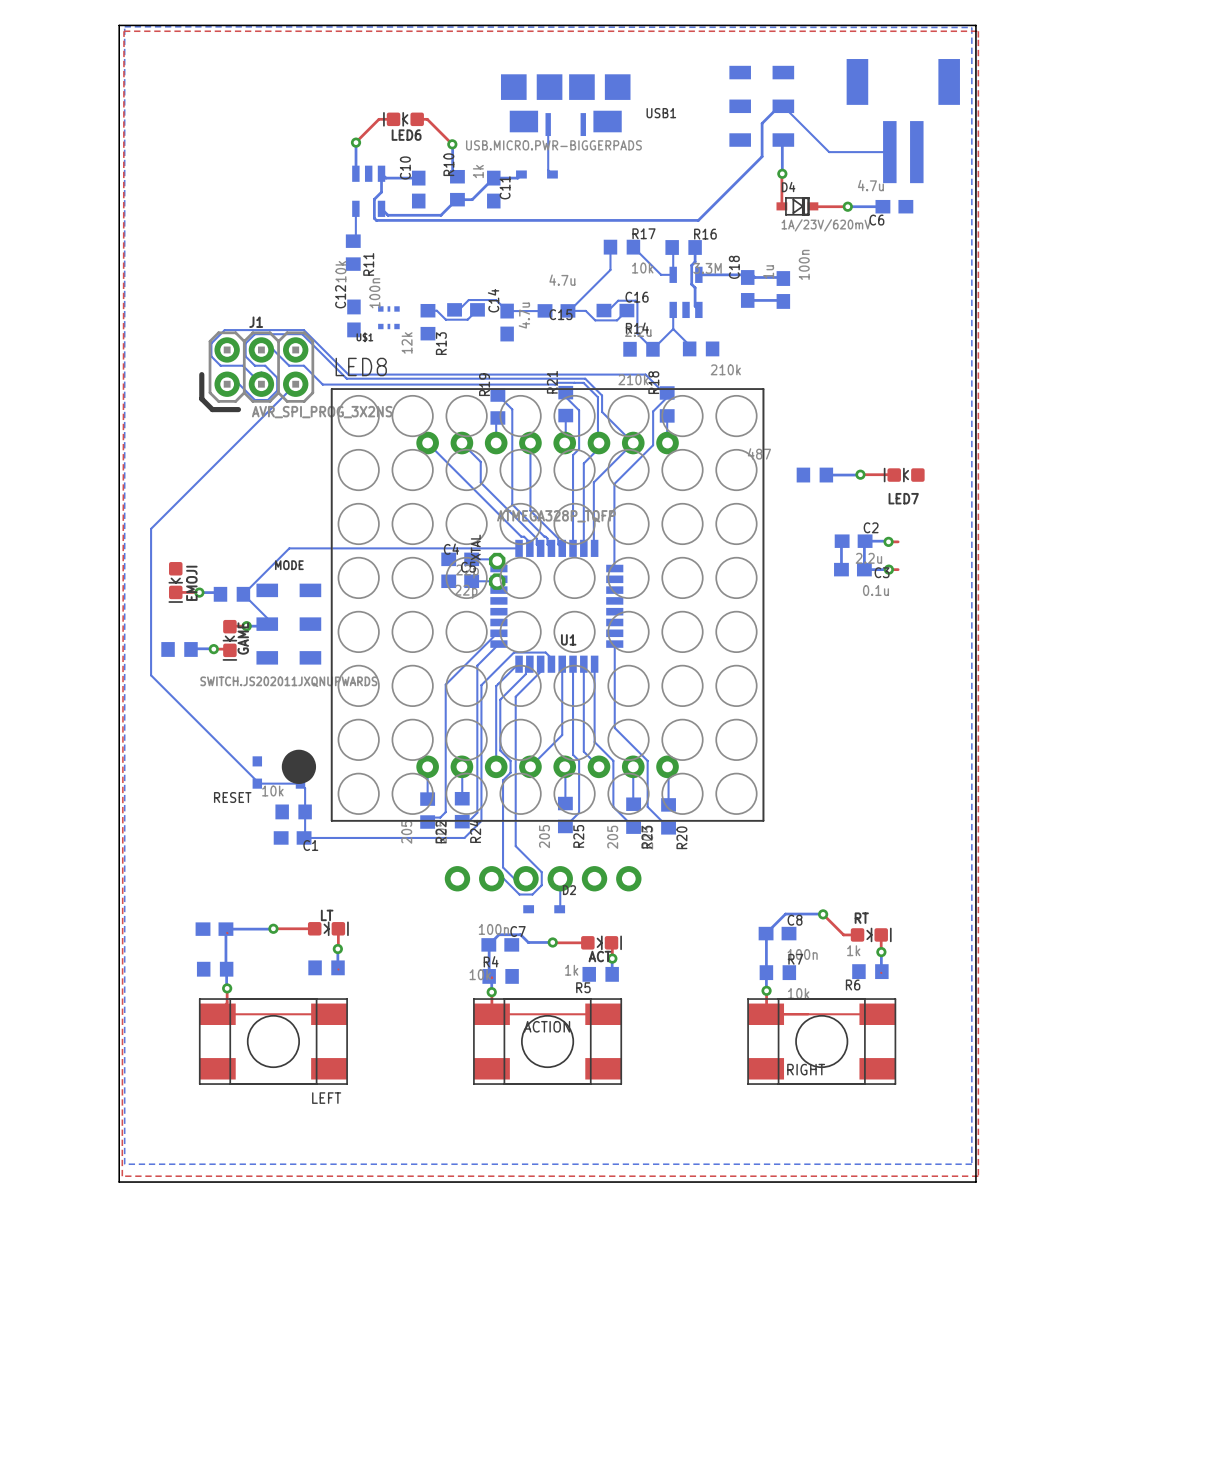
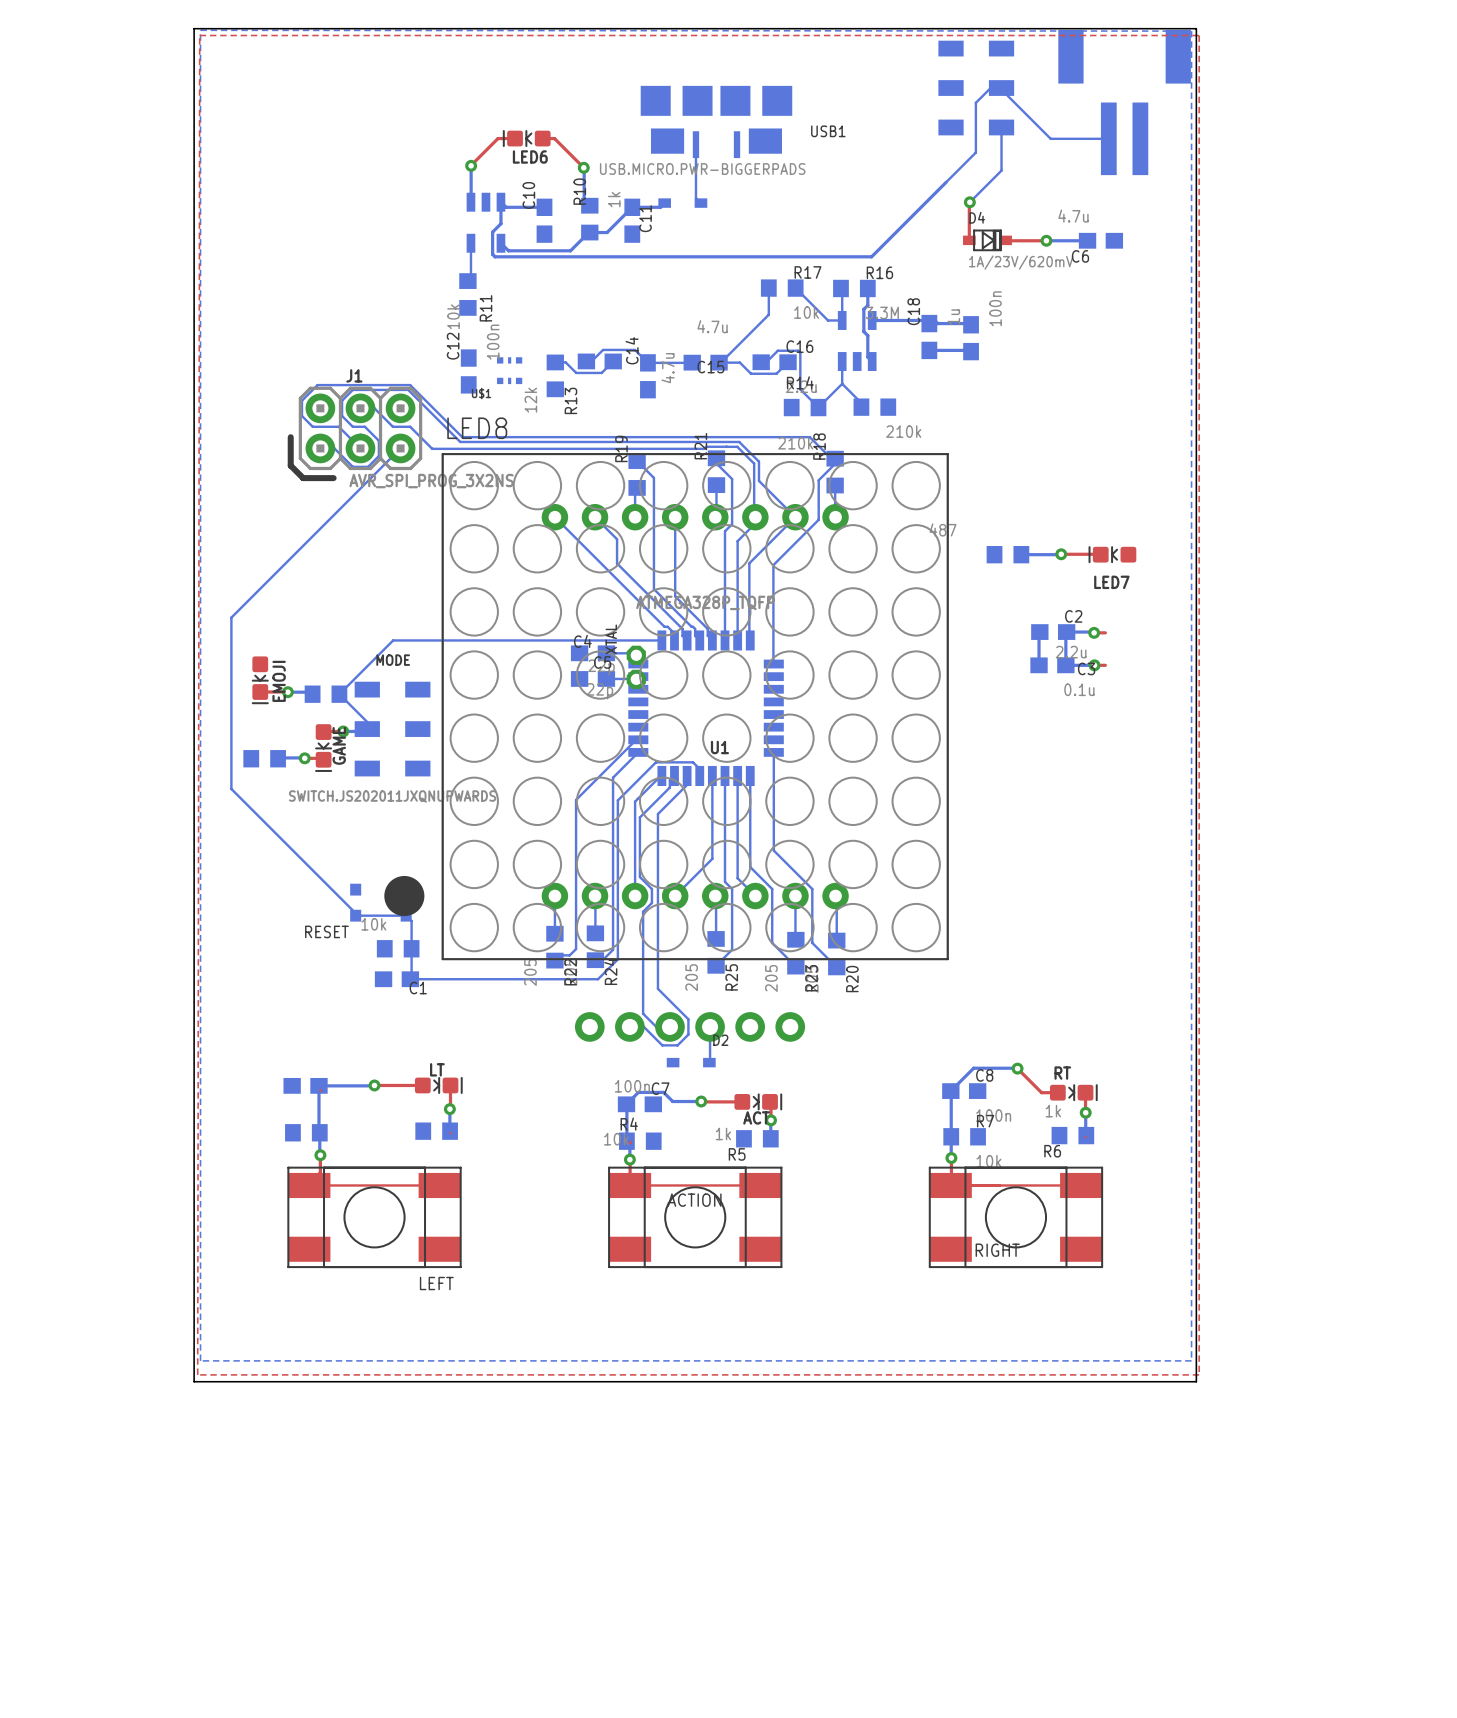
bottom track: none -> (999, 88) (1050, 138) (1108, 138)
part position: (761, 106) -> (976, 88)
bottom track: (783, 106) (778, 106) (762, 123) (762, 156) -> (1001, 88) (990, 88) (975, 102) (975, 152) (946, 182)
bottom track: (783, 106) (829, 152) (889, 152) -> none
part position: (903, 121) -> (1124, 102)
bottom track: (783, 140) (782, 173) -> (1001, 127) (1001, 170) (969, 202)

